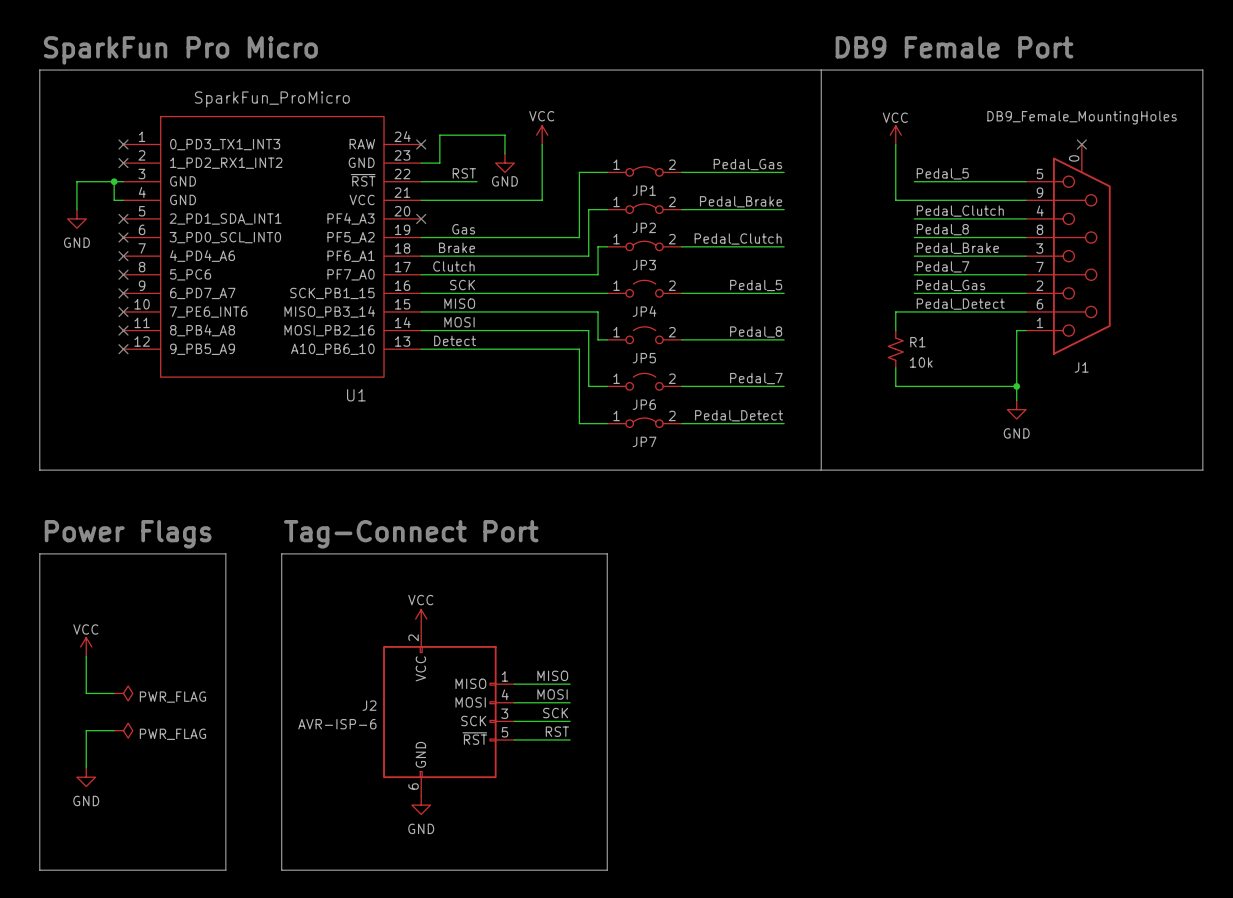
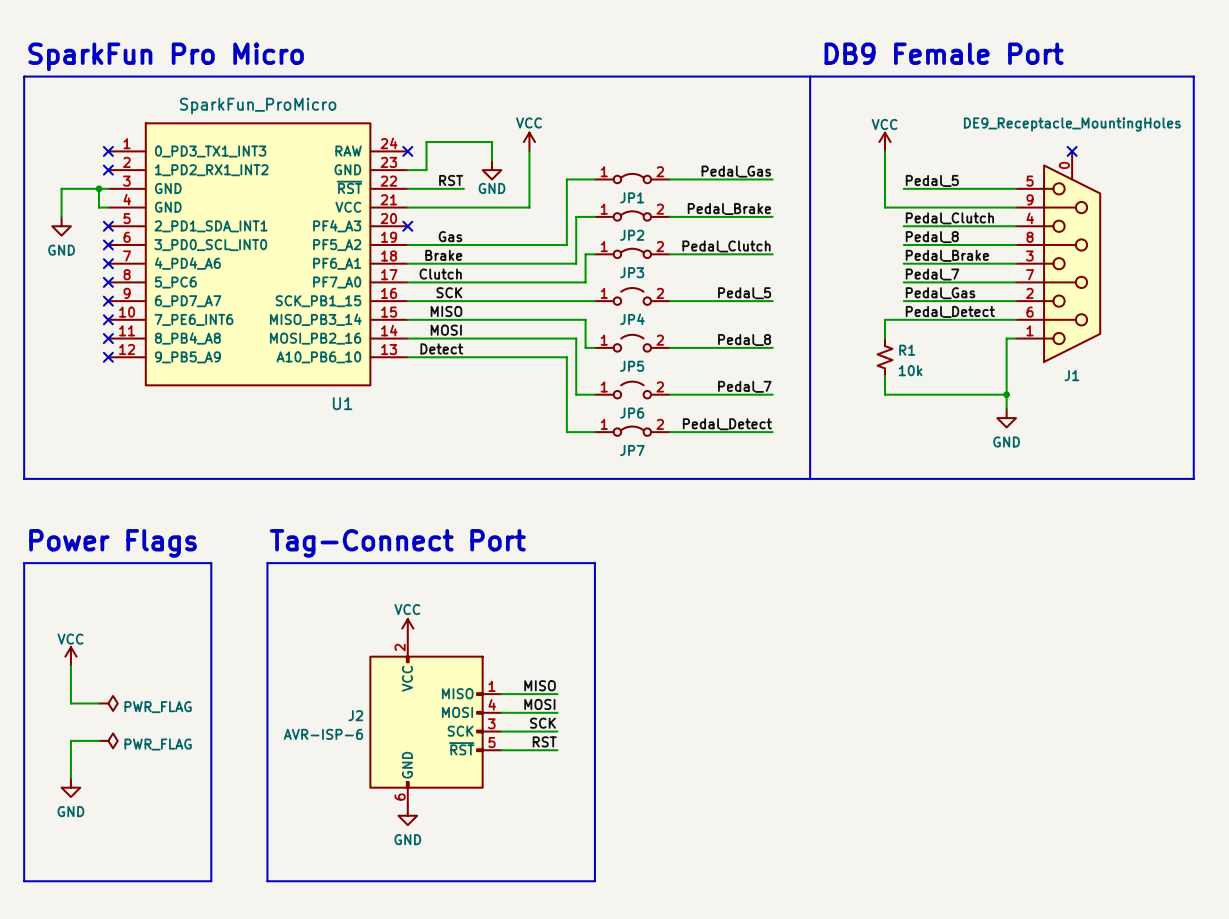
J1 value: DB9_Female_MountingHoles (1082, 117) -> DE9_Receptacle_MountingHoles (1072, 124)

